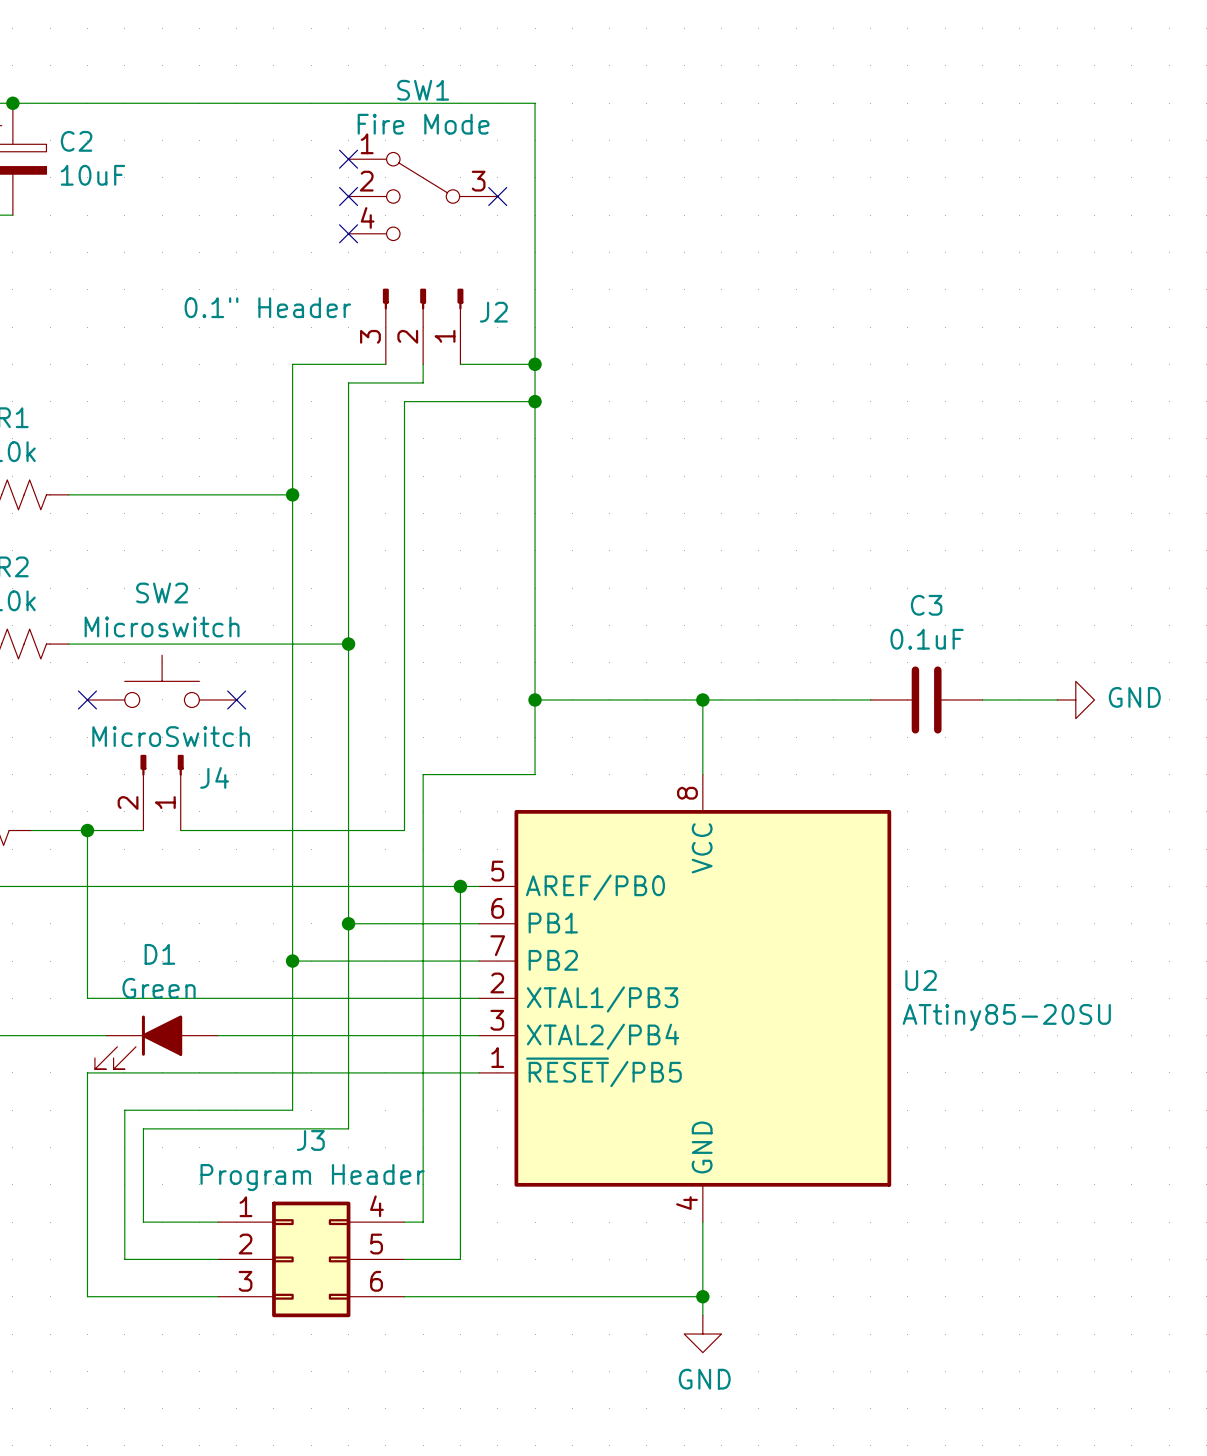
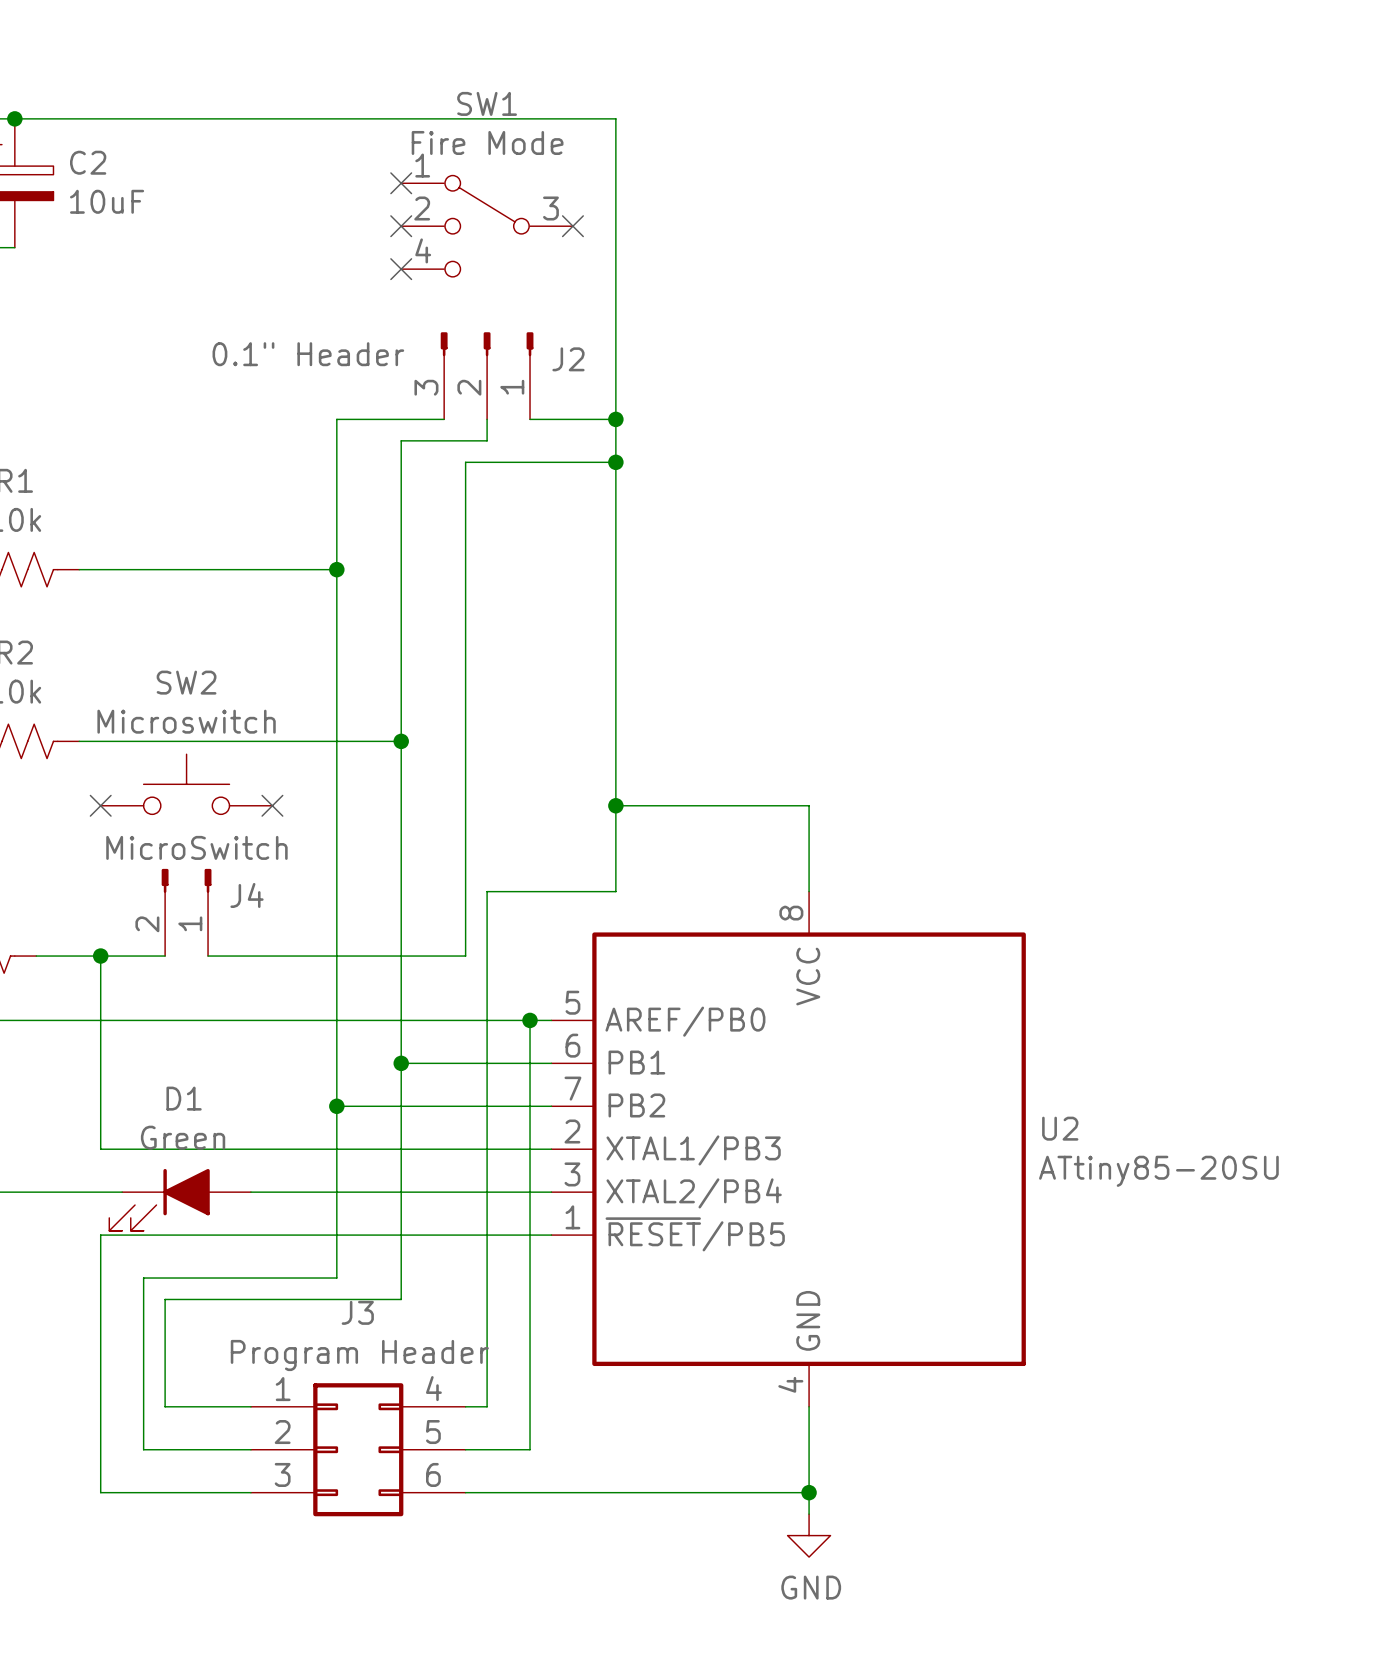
wire: (702, 699) (870, 699) -> none
junction: (702, 699) -> none
C3: 0.1uF (926, 699) -> none
wire: (982, 699) (1057, 699) -> none
power symbol: GND (1075, 699) -> none

